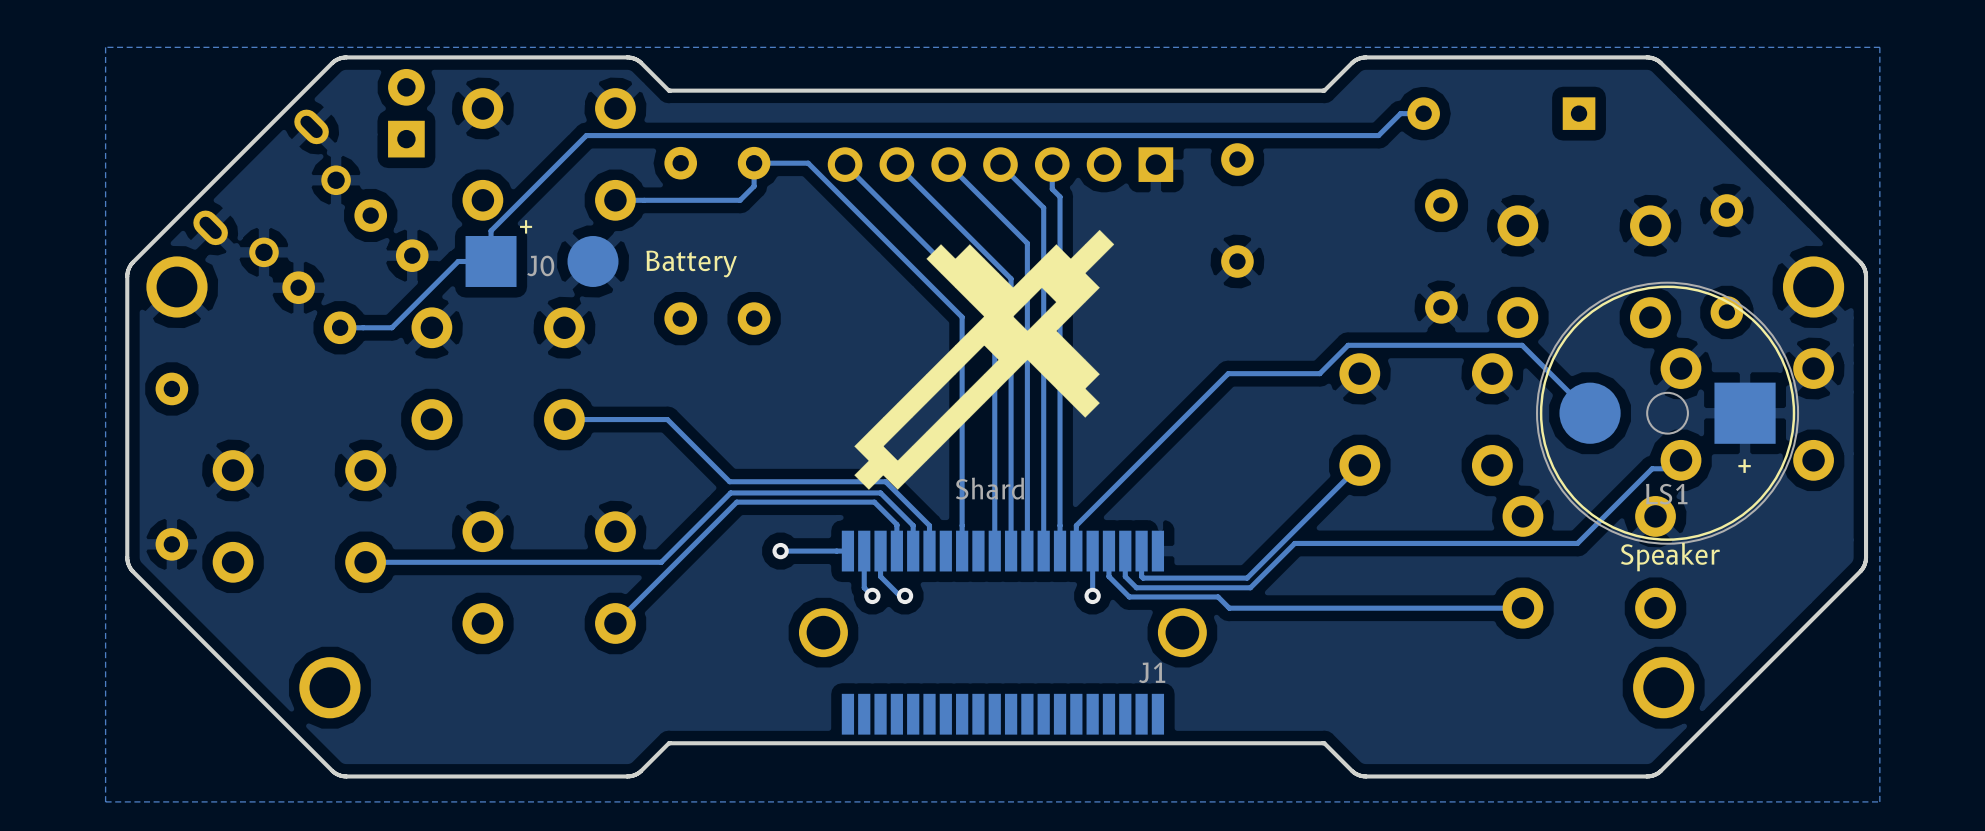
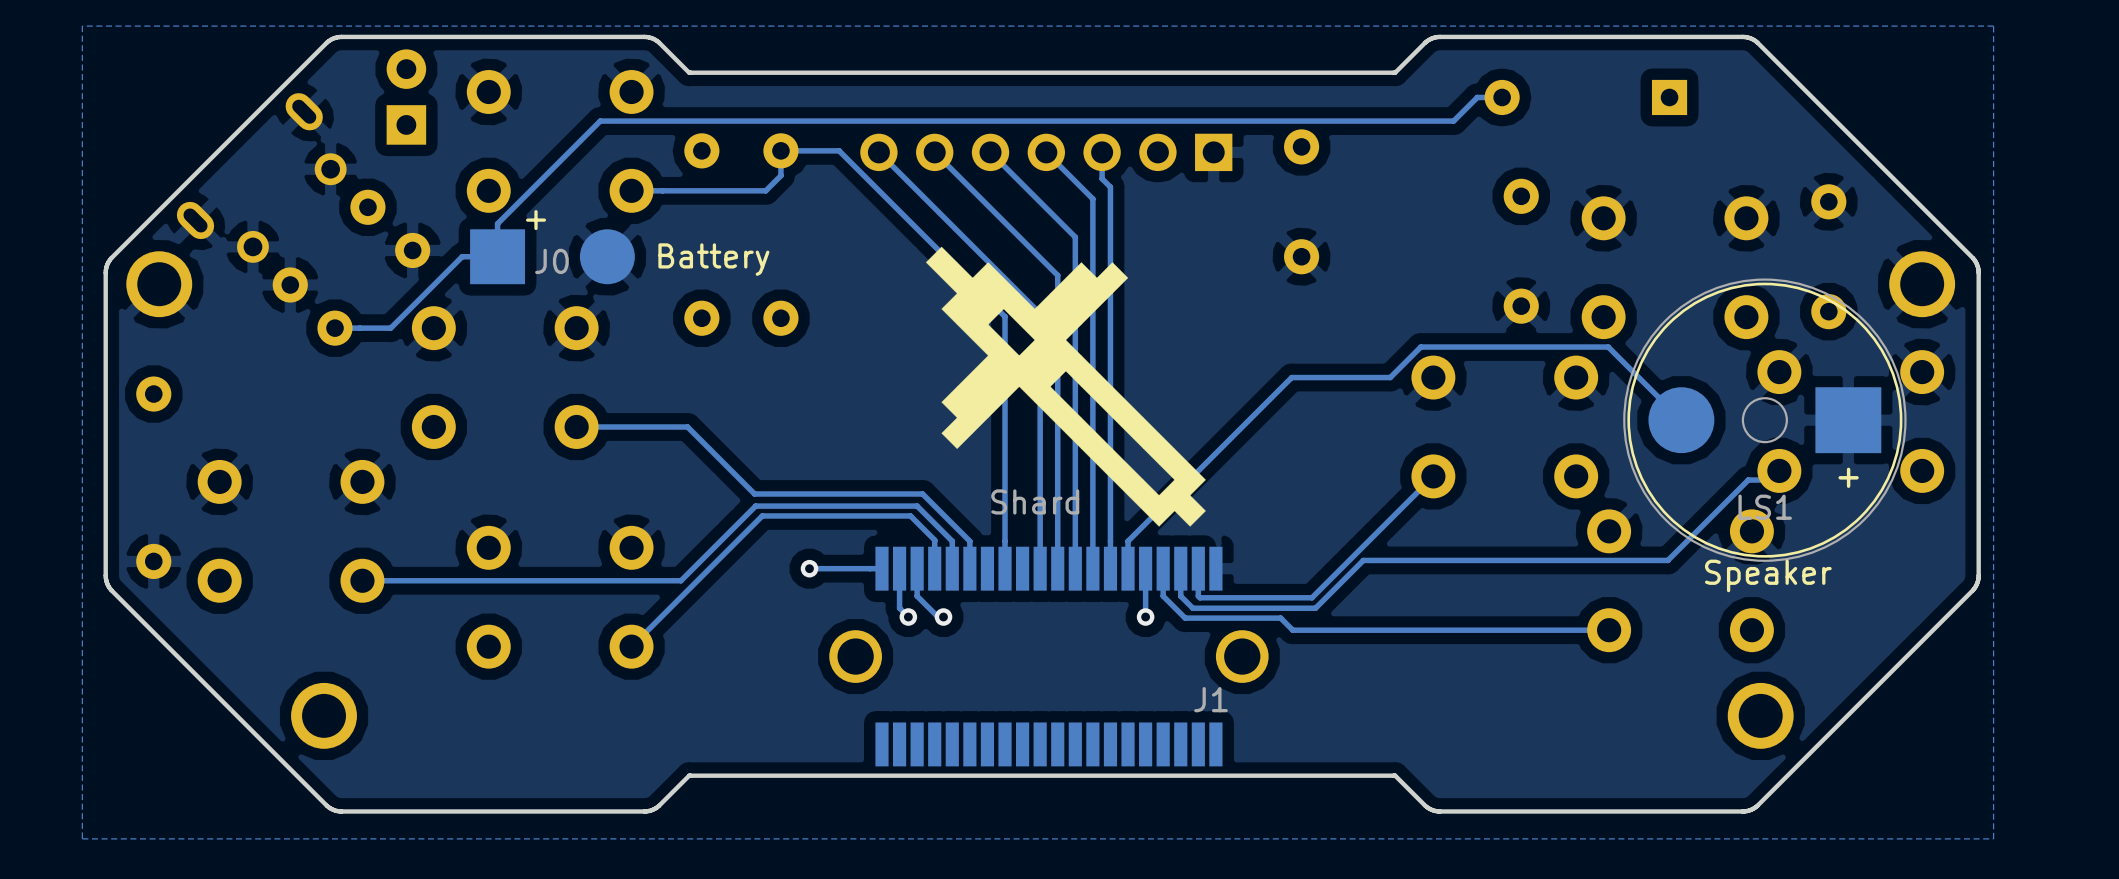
drawing: [854, 229, 1115, 490] -> none
drawing: none -> [925, 246, 1206, 527]

